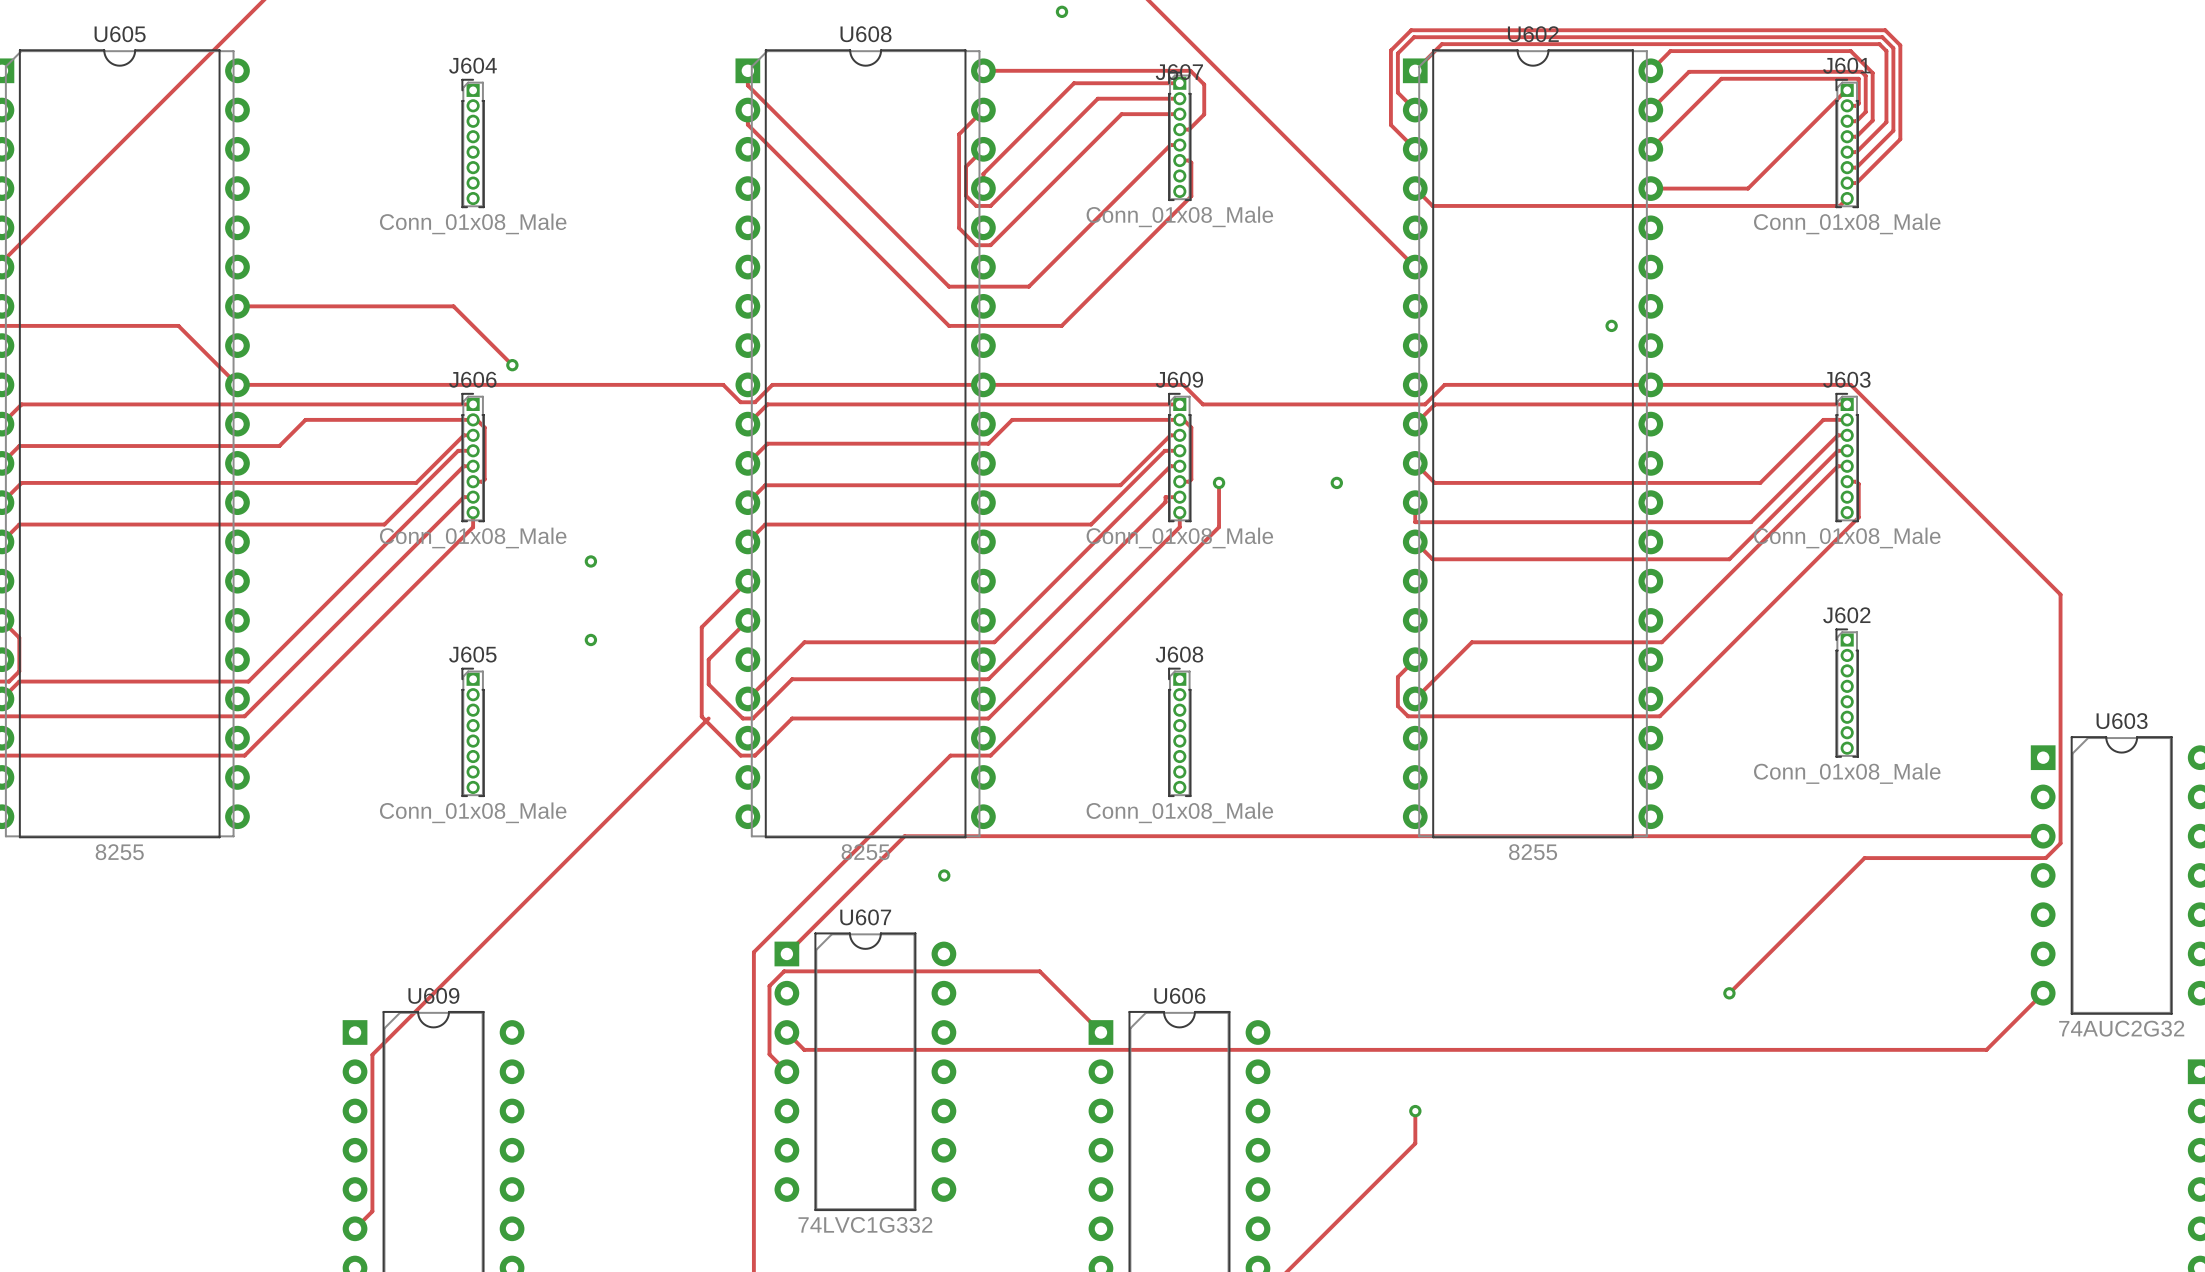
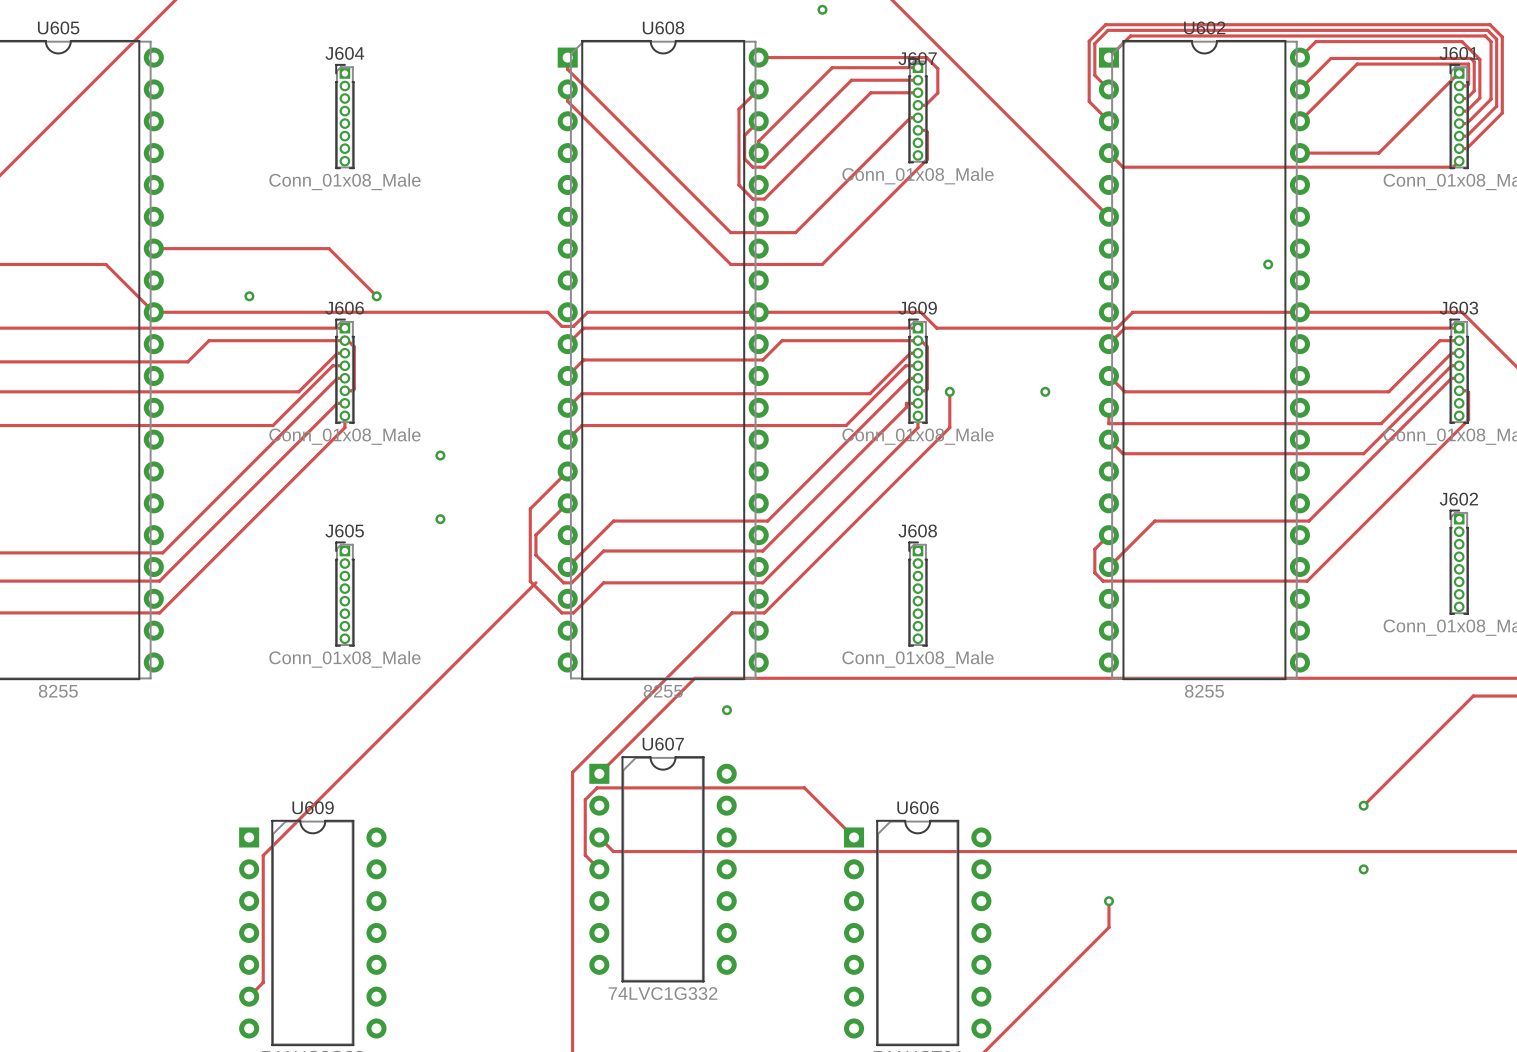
via: none -> (249, 296)
via: none -> (1363, 869)

